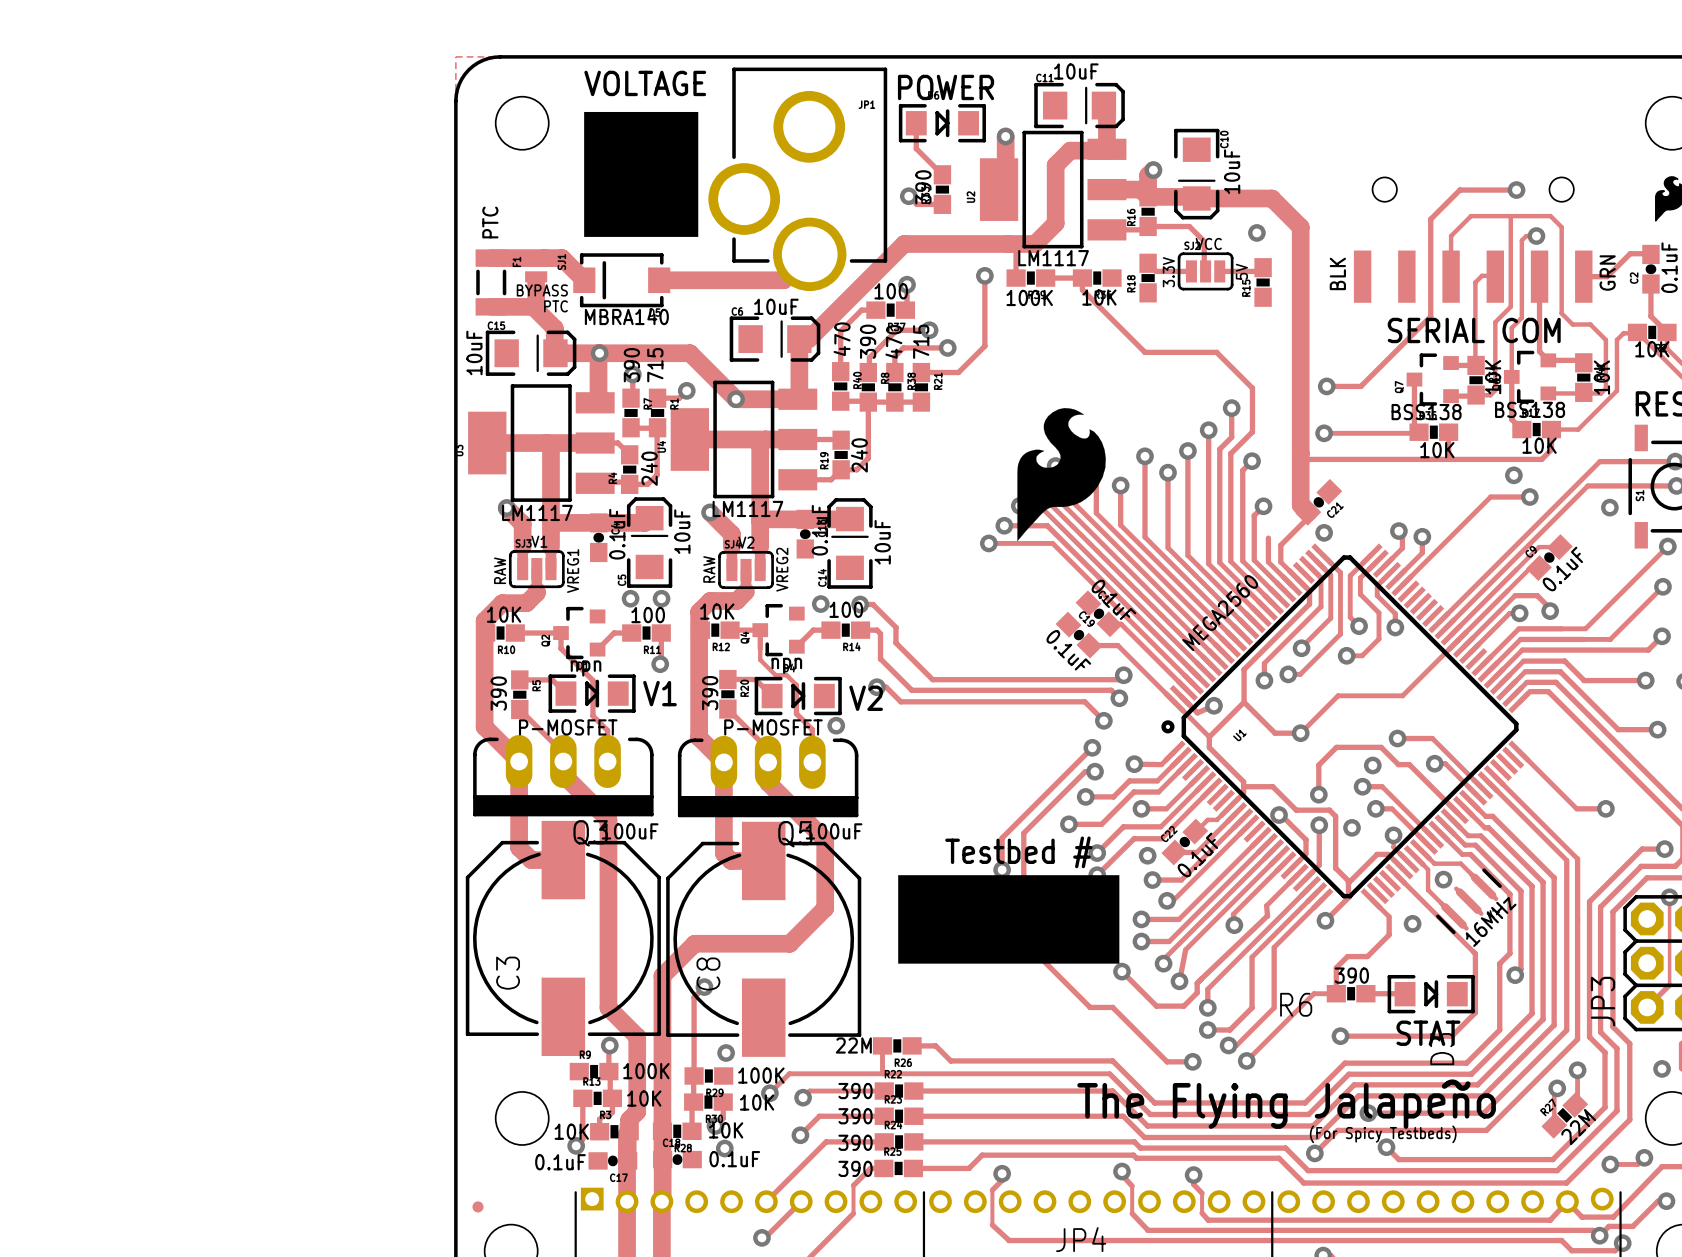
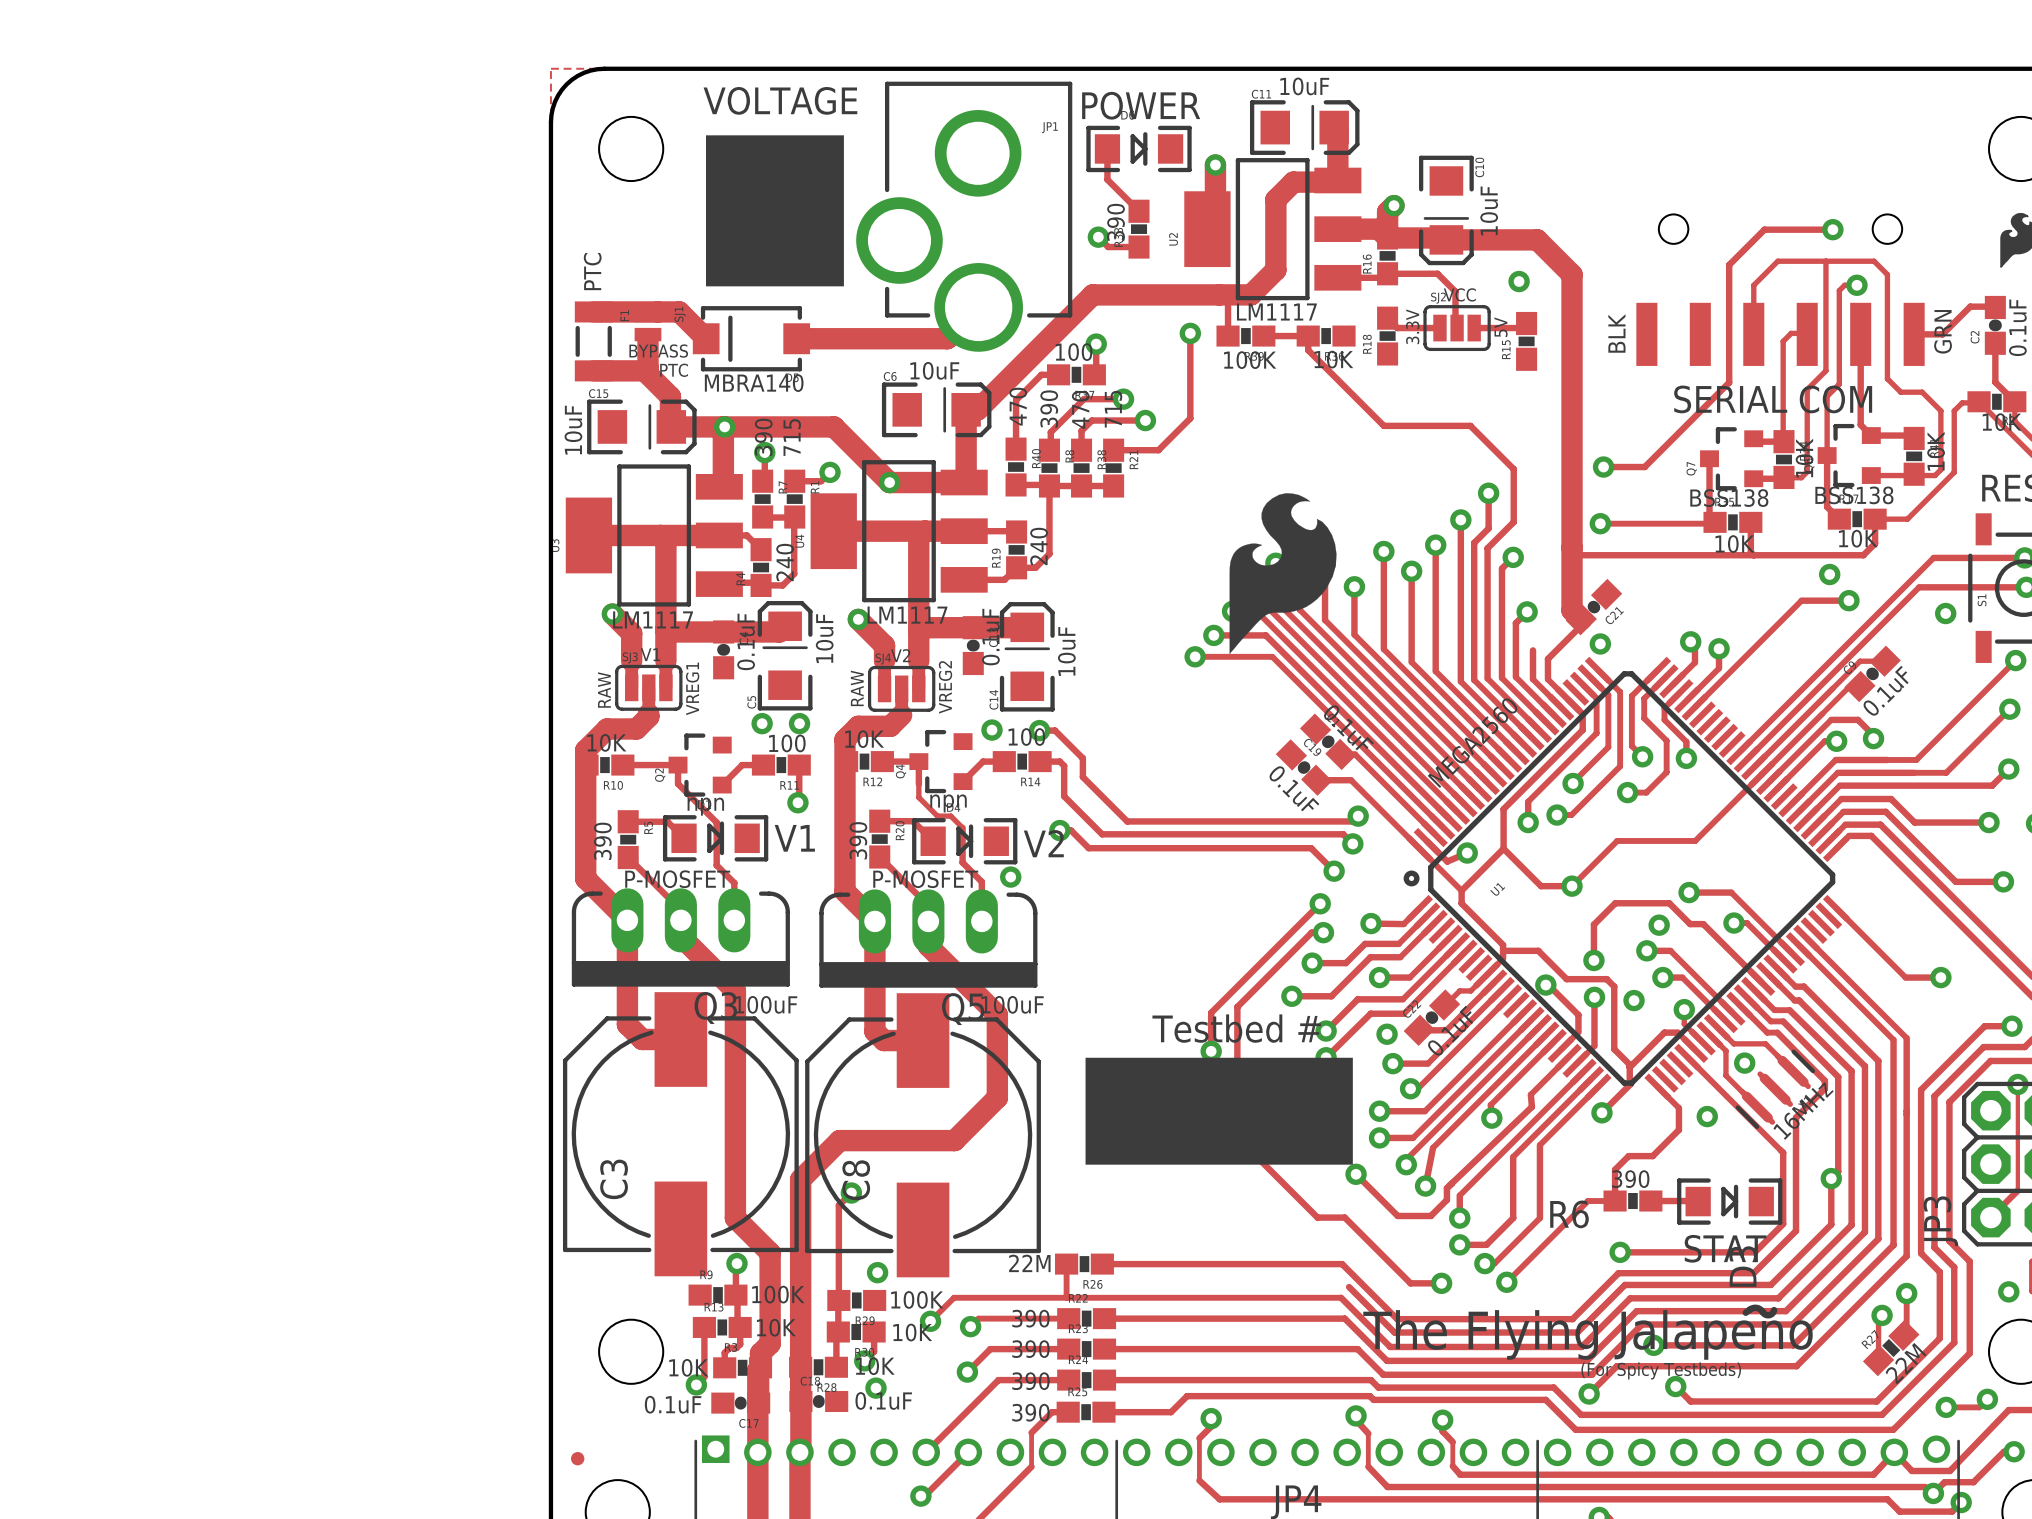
track: (1509, 900) (1509, 953) (1499, 963) (1499, 1029) (1465, 1063) -> (1831, 1178) (1831, 1224) (1770, 1284)
track: none -> (1824, 1088) (1796, 1117) (1796, 1230) (1753, 1273) (1618, 1273) (1572, 1319) (1397, 1319) (1342, 1264) (1130, 1264)
track: (935, 1045) (950, 1060) (1112, 1060) (1154, 1102) (1305, 1102) (1344, 1063) -> (1349, 1287) (1394, 1332) (1577, 1332) (1625, 1284)

